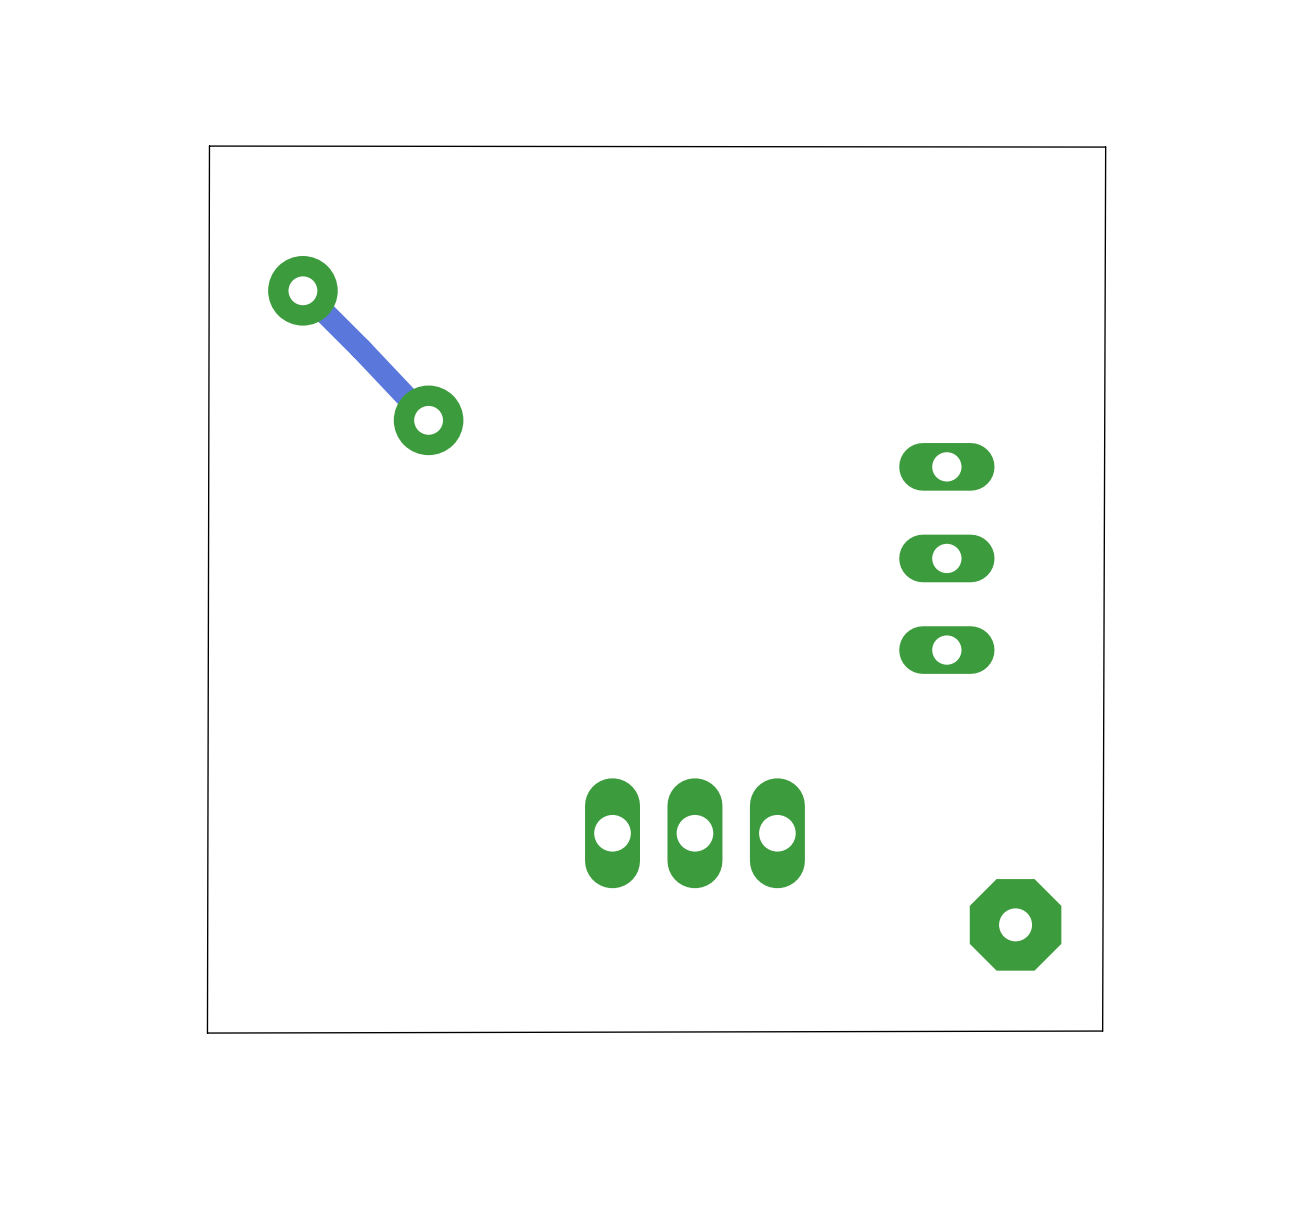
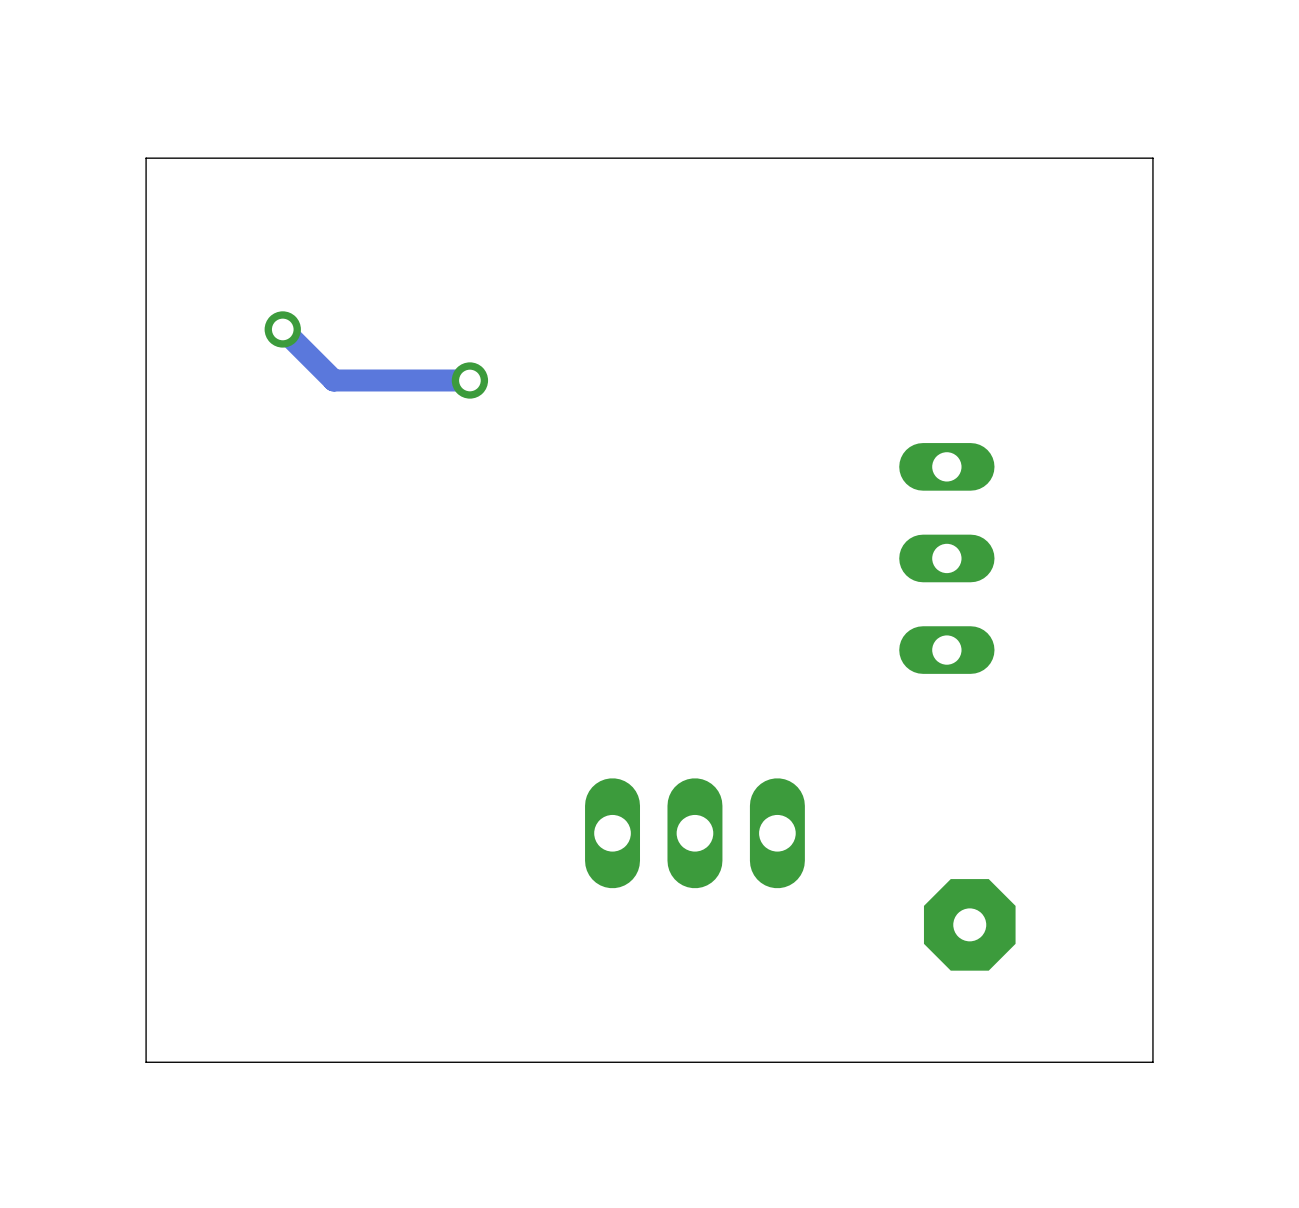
board edge: (209, 146) (207, 1033) (1102, 1031) (1105, 147) (209, 146) -> (1152, 158) (1152, 1062) (146, 1062) (146, 158) (1152, 158)
track: (302, 290) (428, 420) -> none
via: (302, 290) -> none
track: none -> (282, 329) (333, 380) (469, 380)
via: none -> (282, 329)
via: none -> (469, 380)
via: (428, 420) -> none
part position: (1015, 924) -> (969, 924)

